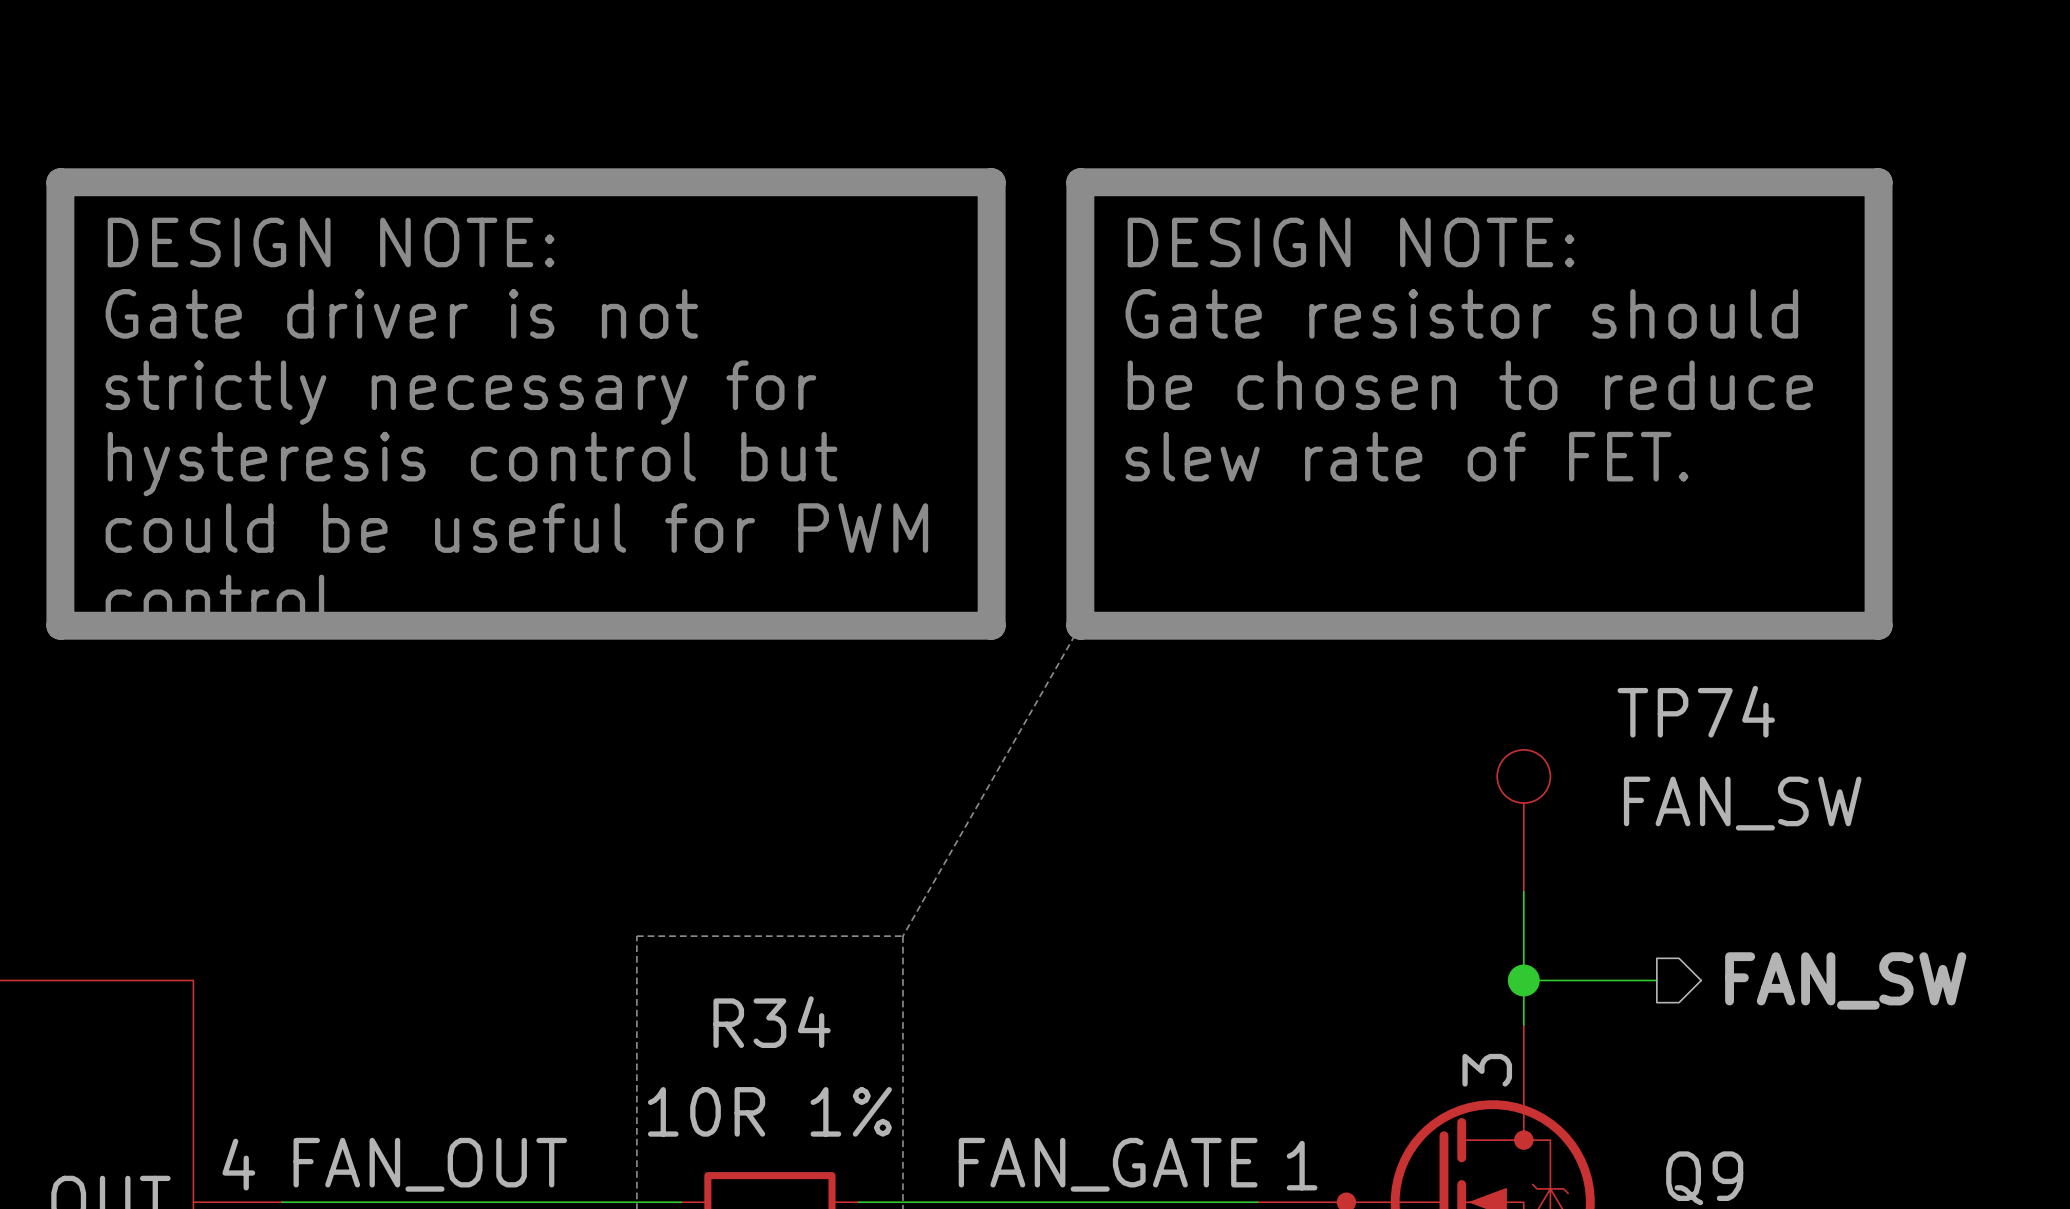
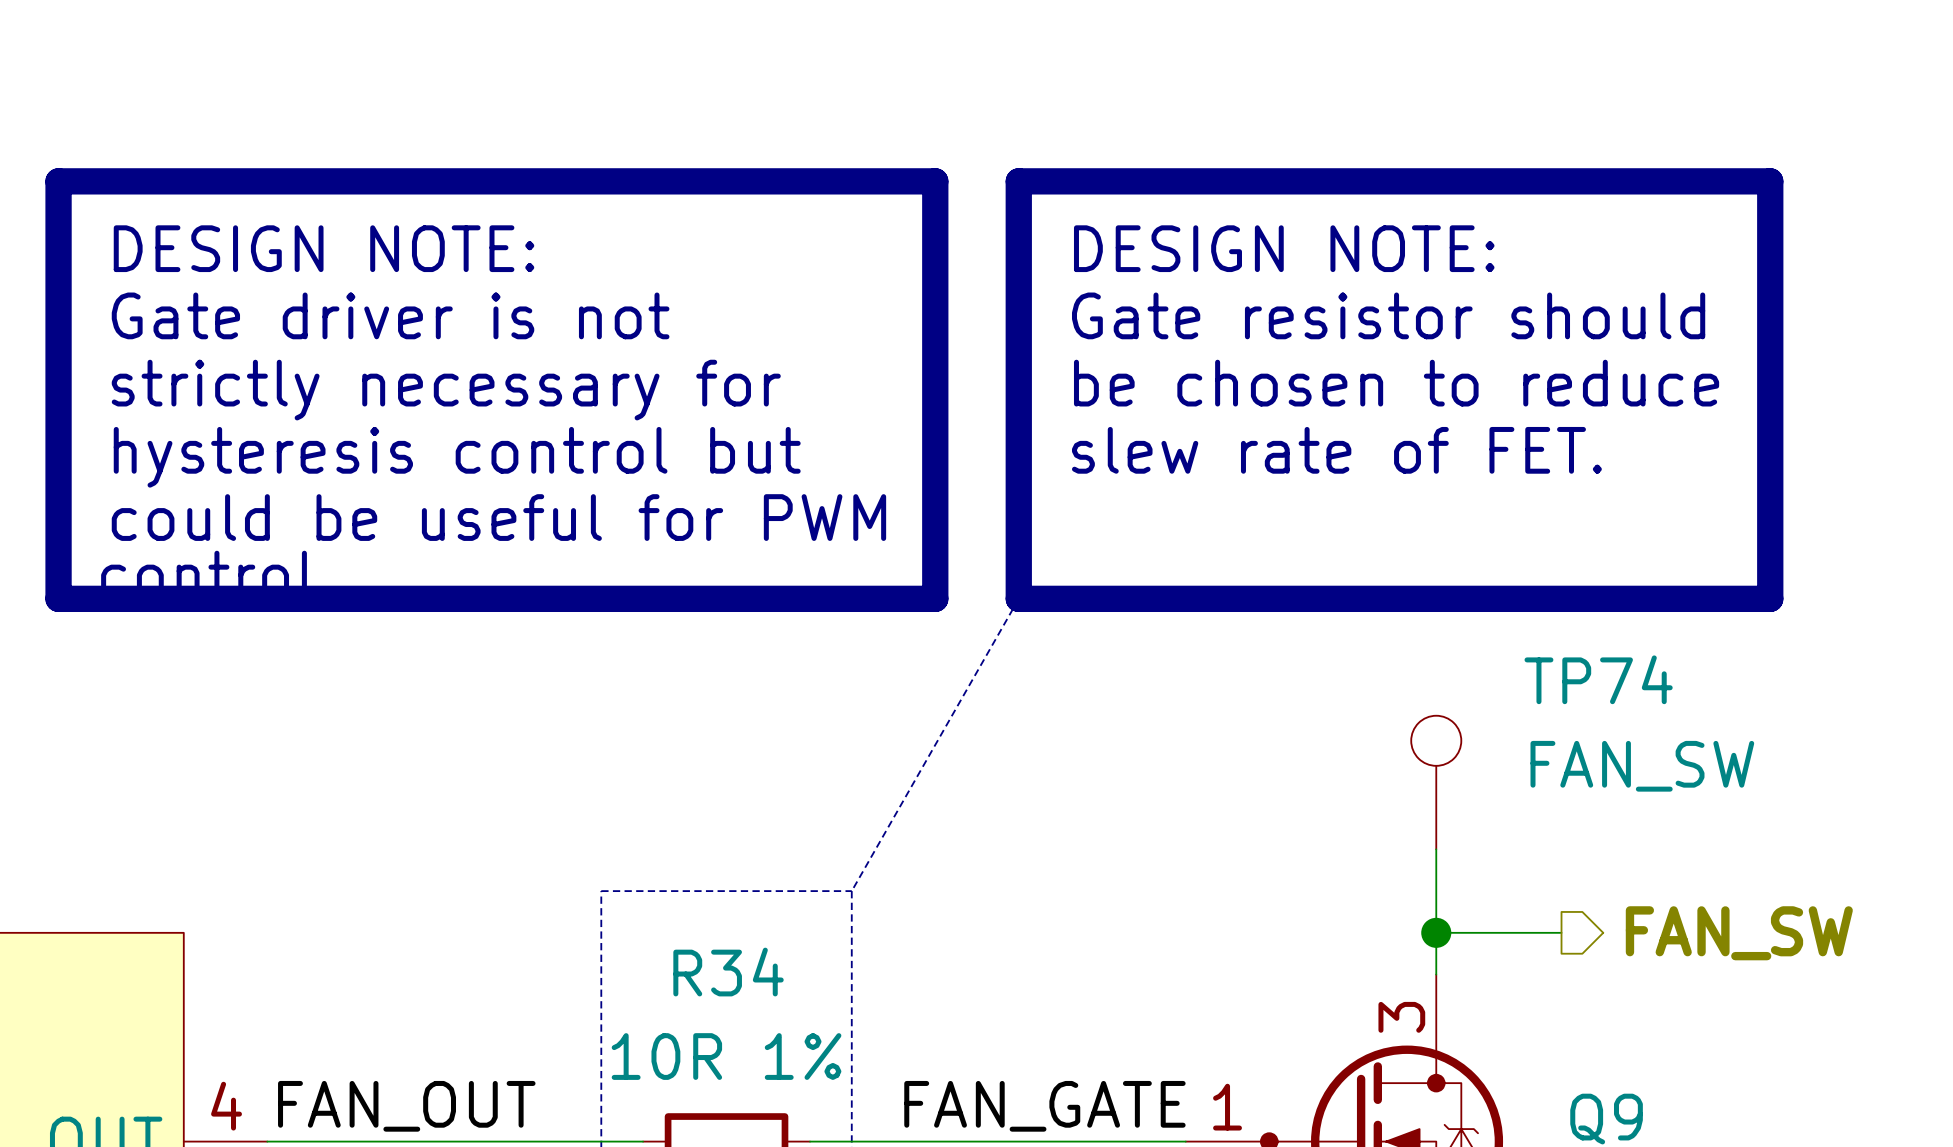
text position: DESIGN NOTE: (331, 242) -> DESIGN NOTE: (324, 248)
text position: DESIGN NOTE: (1351, 242) -> DESIGN NOTE: (1284, 248)
text position: Gate driver is not (401, 313) -> Gate driver is not (390, 315)
text position: Gate resistor should (1461, 313) -> Gate resistor should (1388, 315)
text position: be chosen to reduce (1470, 385) -> be chosen to reduce (1396, 383)
text position: strictly necessary for (460, 392) -> strictly necessary for (446, 390)
text position: slew rate of FET. (1406, 456) -> slew rate of FET. (1336, 450)
text position: hysteresis control but (472, 464) -> hysteresis control but (457, 457)
text position: could be useful for PWM (516, 528) -> could be useful for PWM (498, 517)

